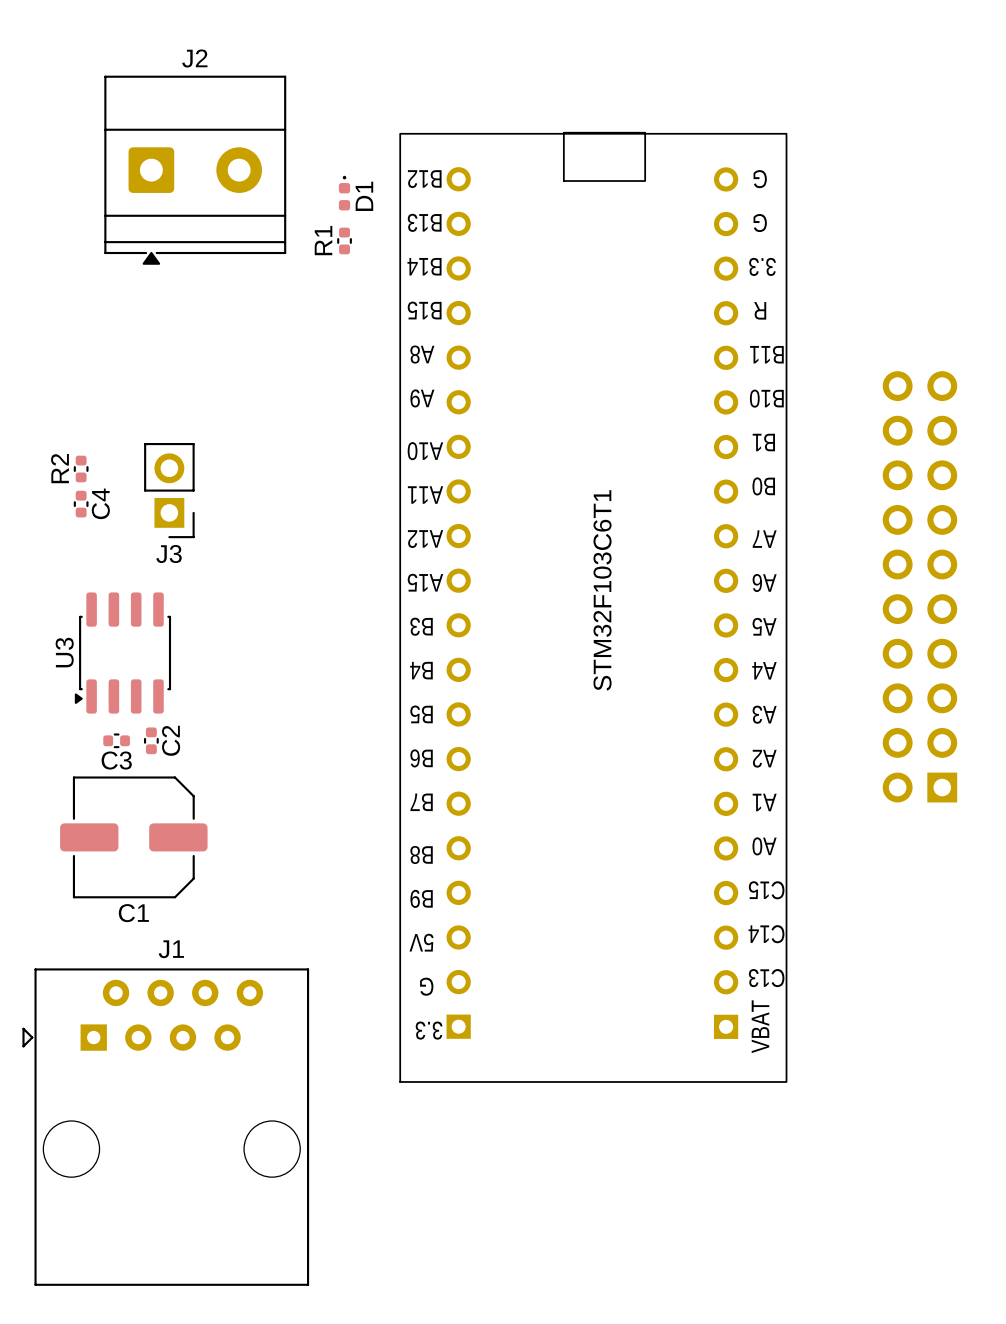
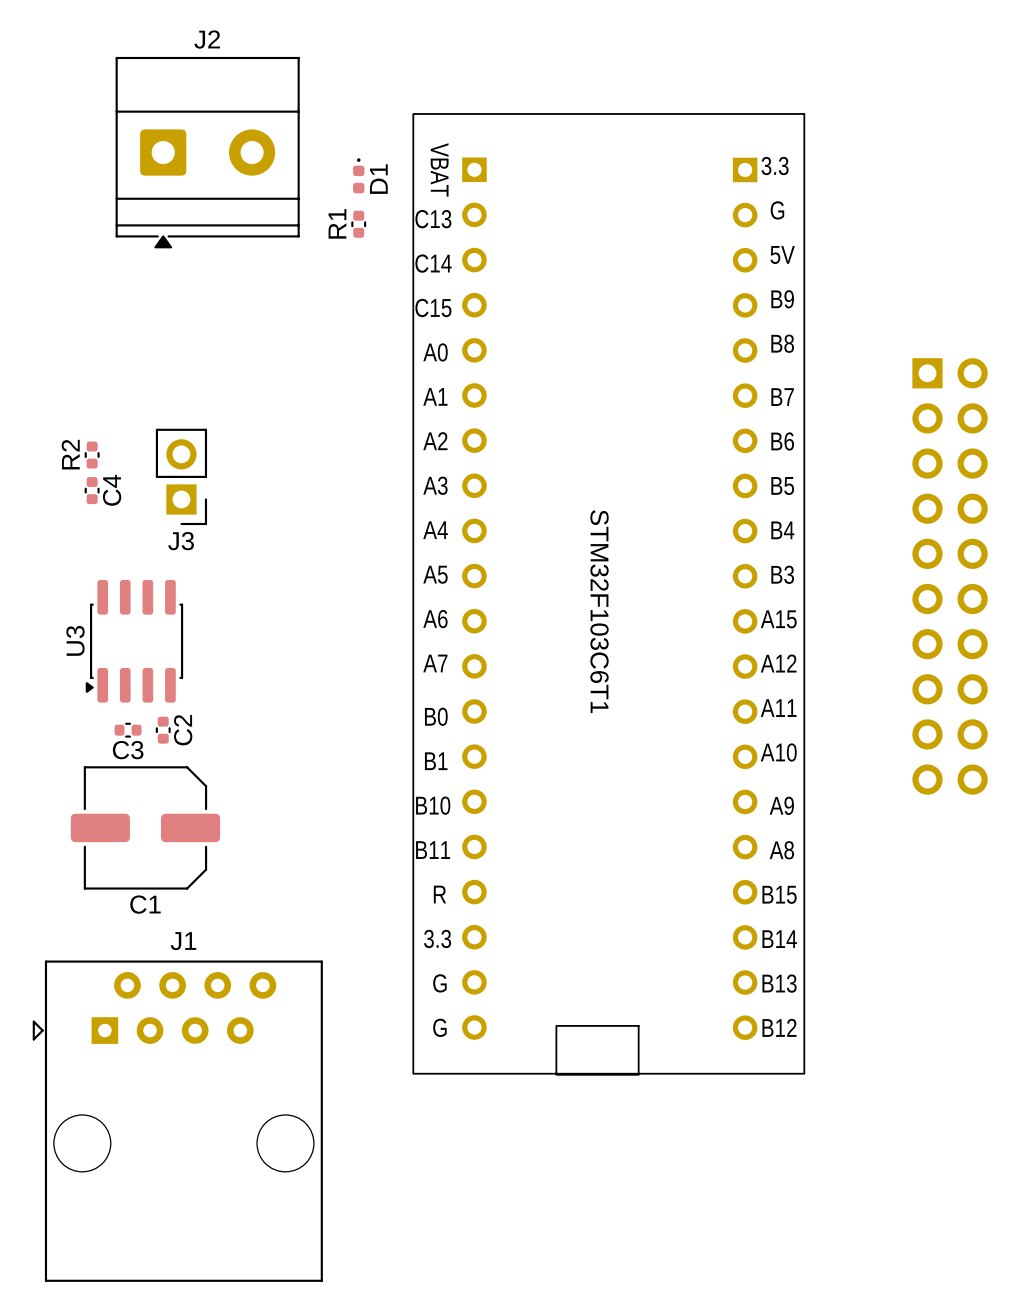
part rotation: 0° (919, 586) -> 180° (950, 576)
STM32F103C6T1 rotation: 0° (593, 607) -> 180° (608, 594)

